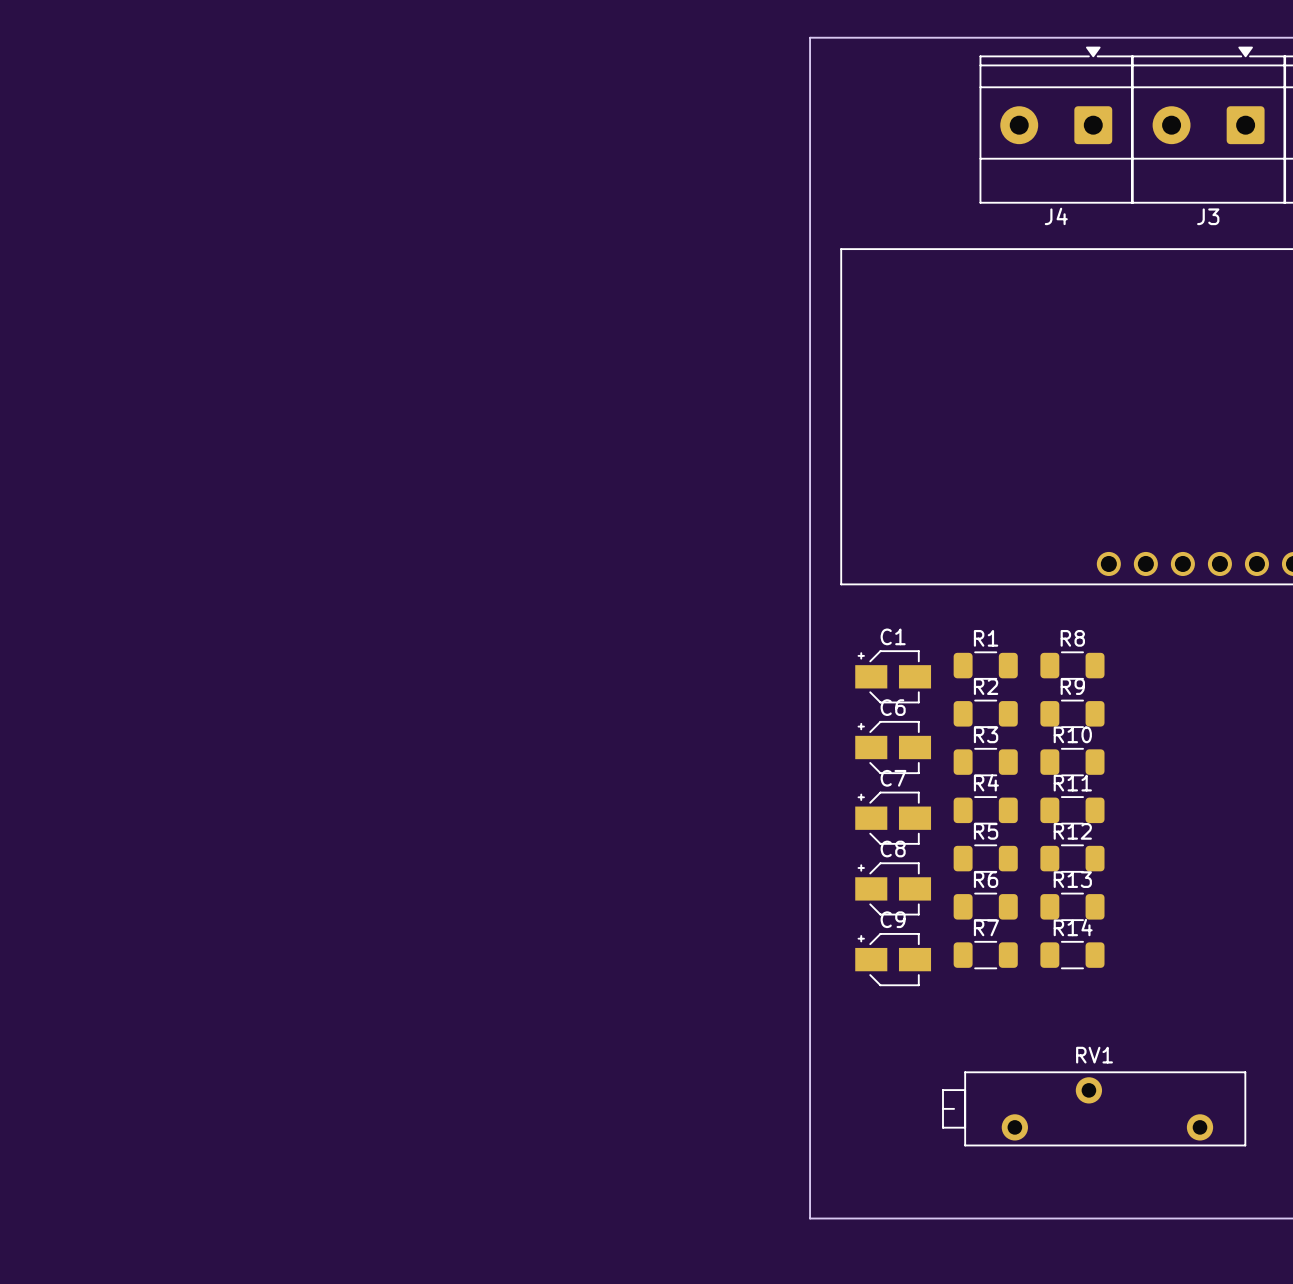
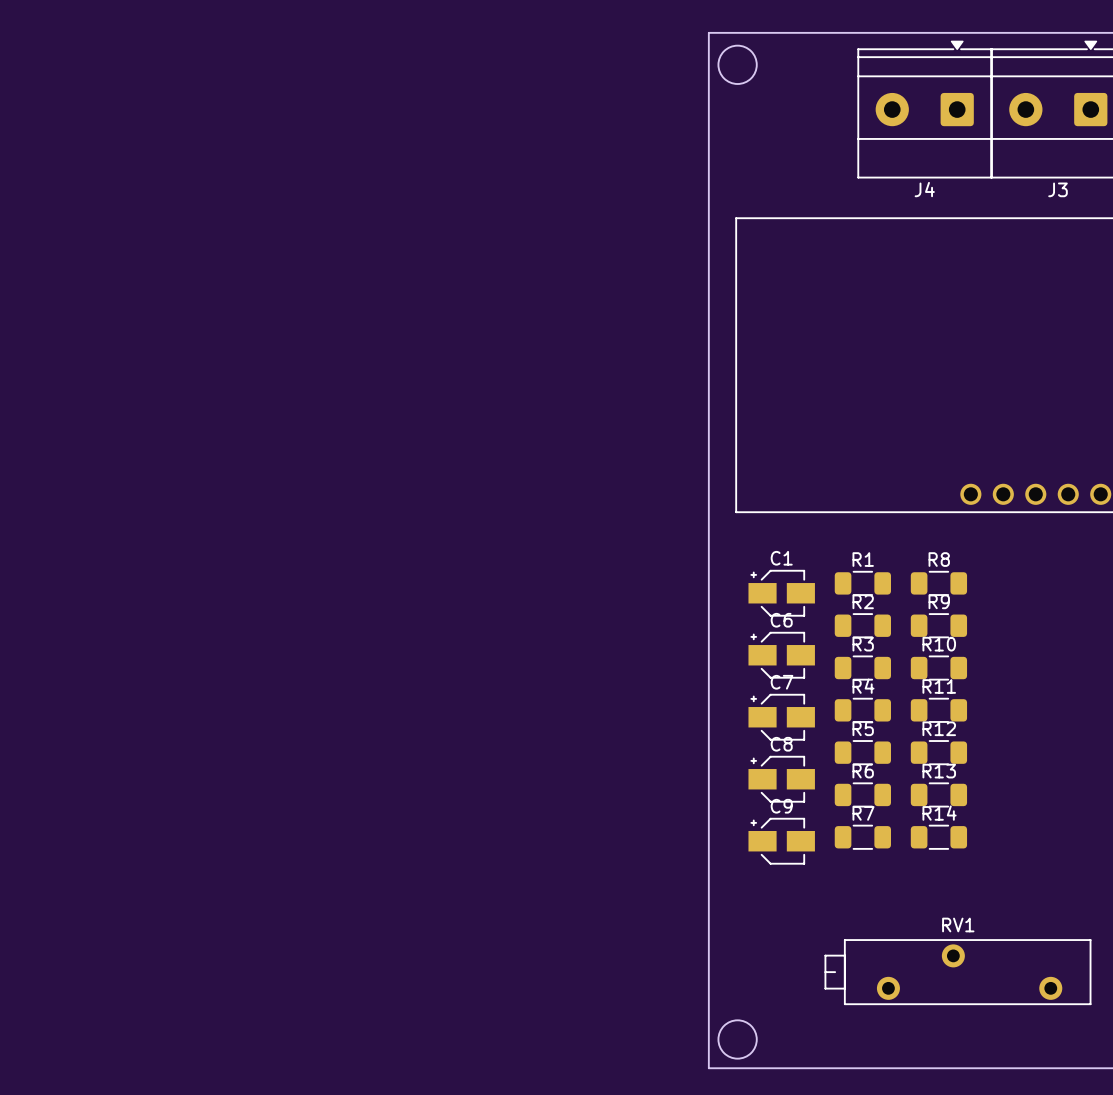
round board edge: none -> [718, 45, 758, 85]
round board edge: none -> [718, 1019, 758, 1059]

